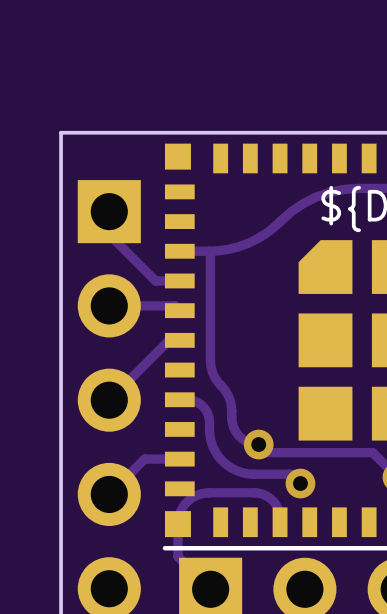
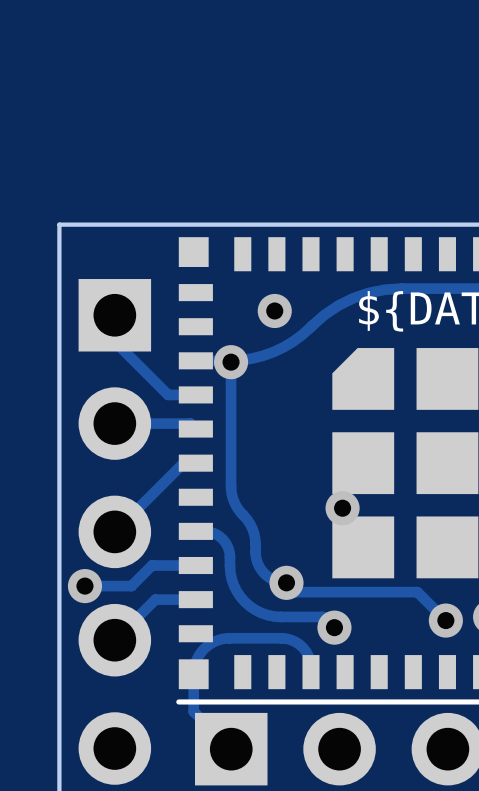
via: none -> (274, 310)
via: none -> (231, 362)
via: none -> (342, 508)
track: none -> (195, 565) (152, 565) (131, 586) (84, 586)
via: none -> (84, 586)

